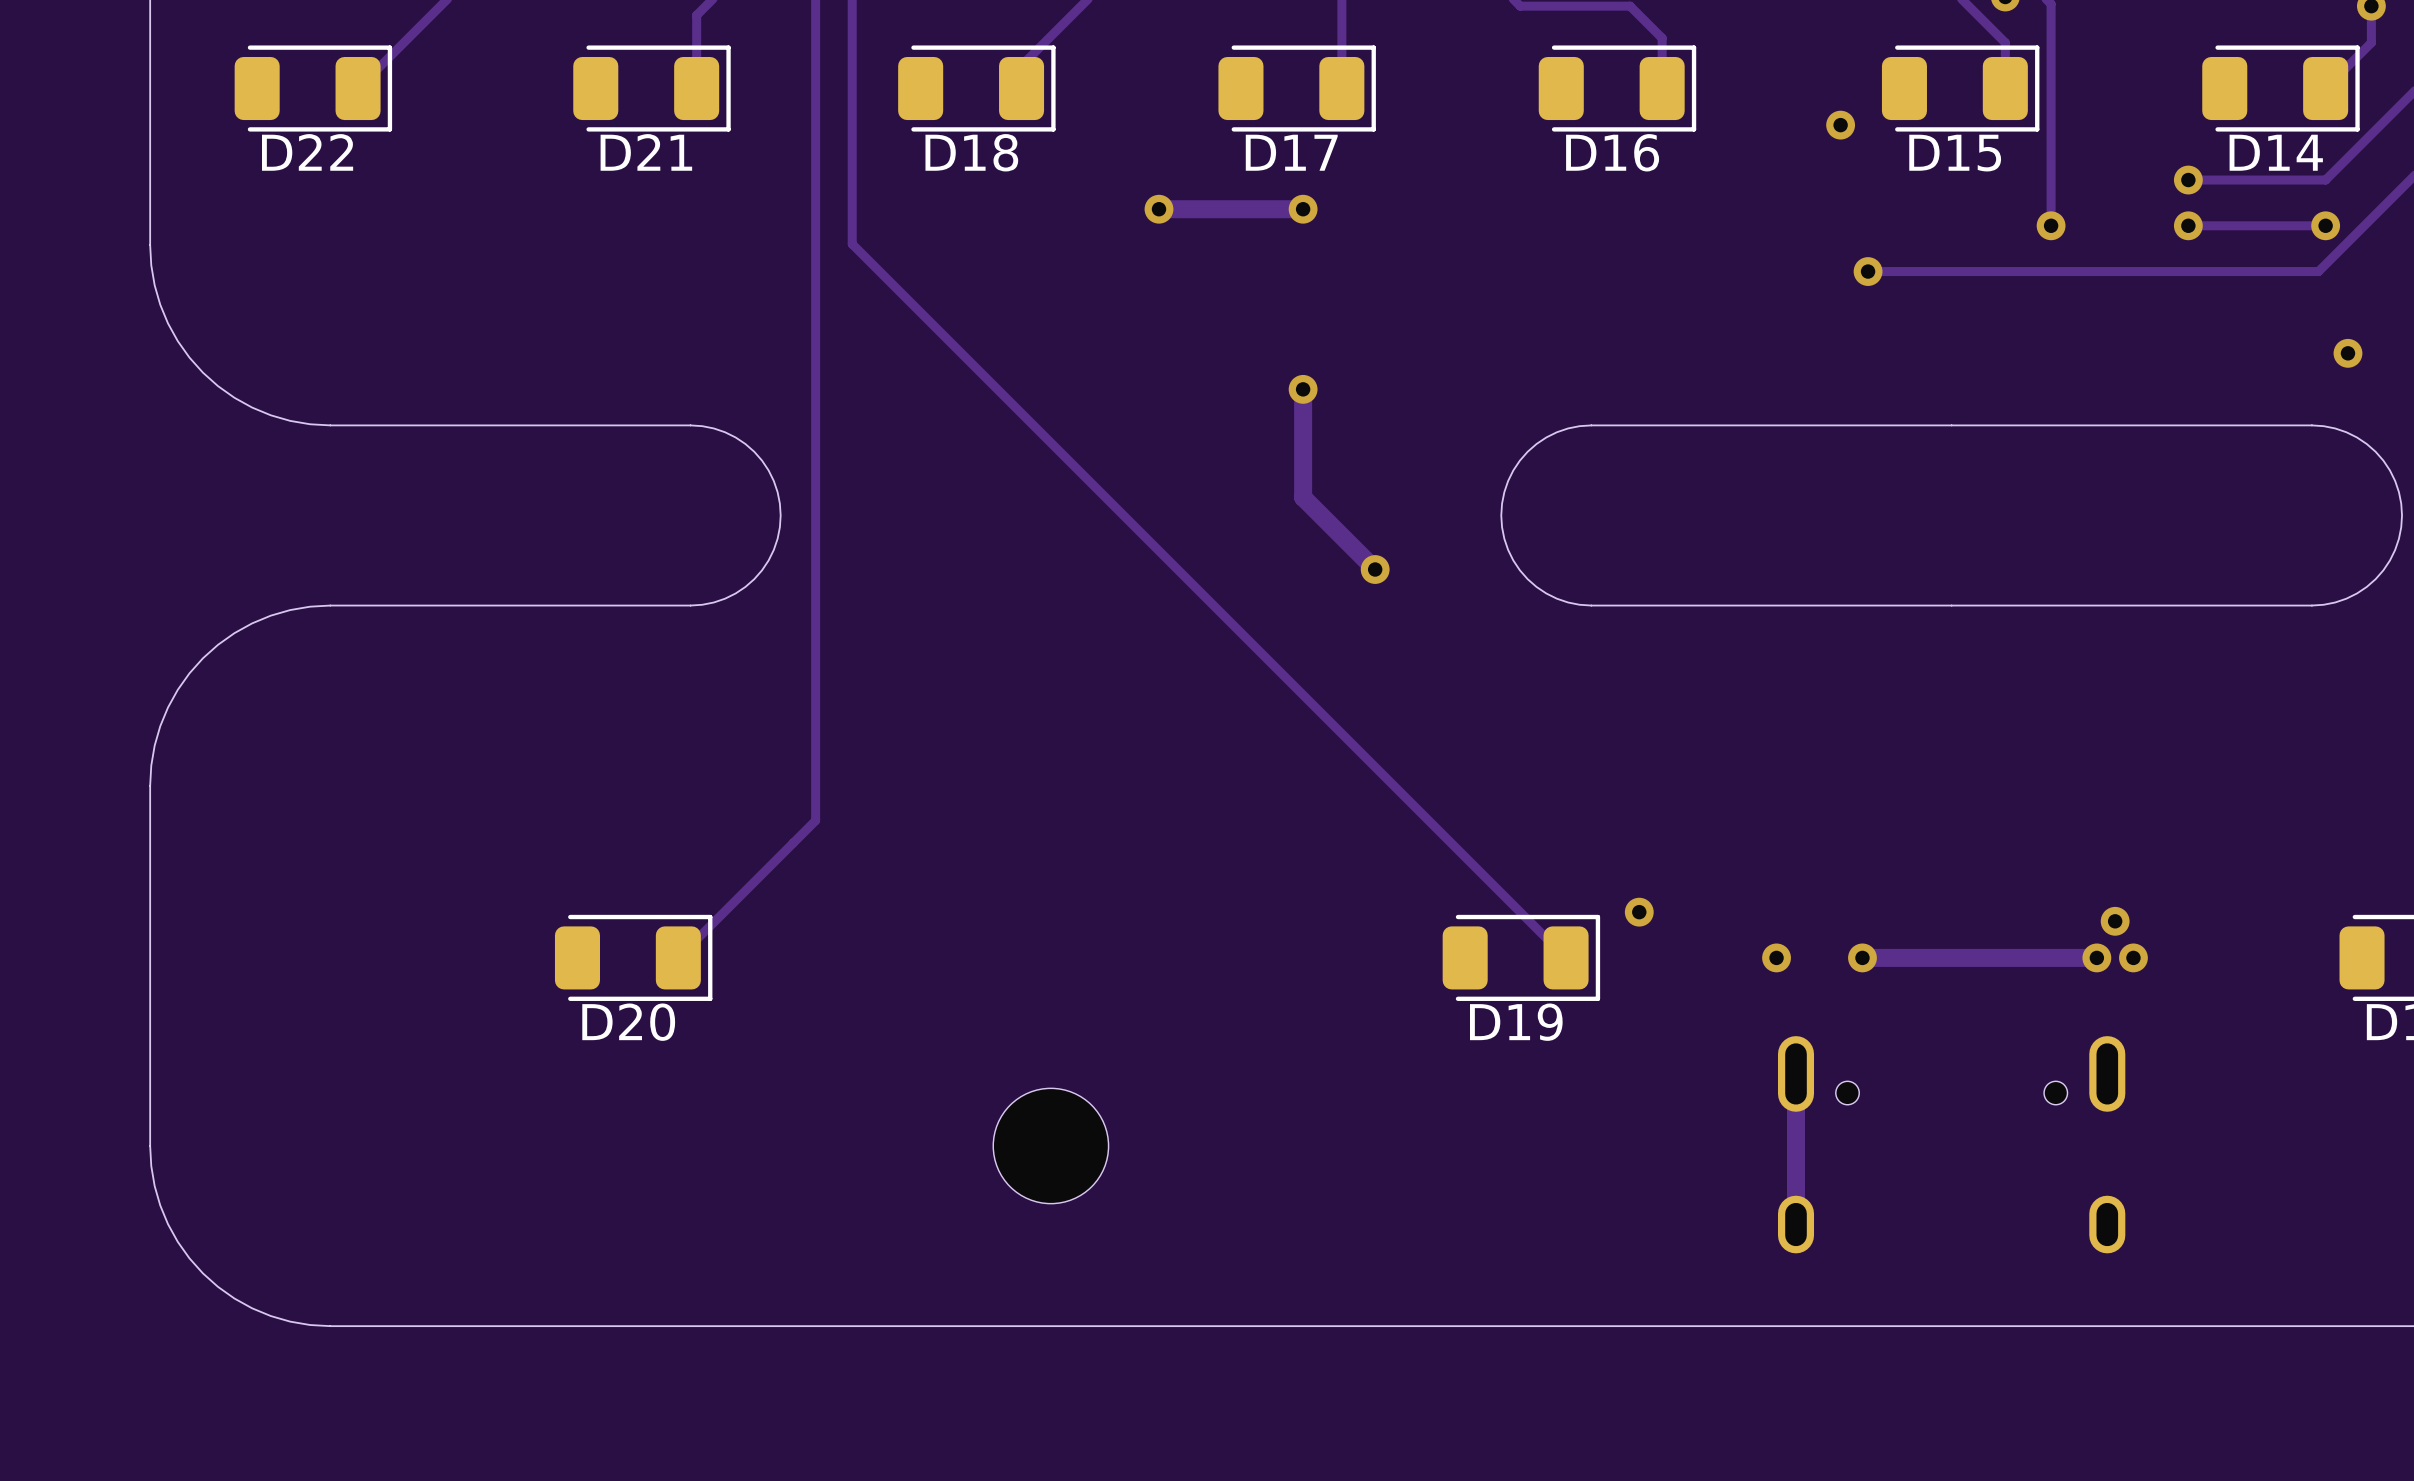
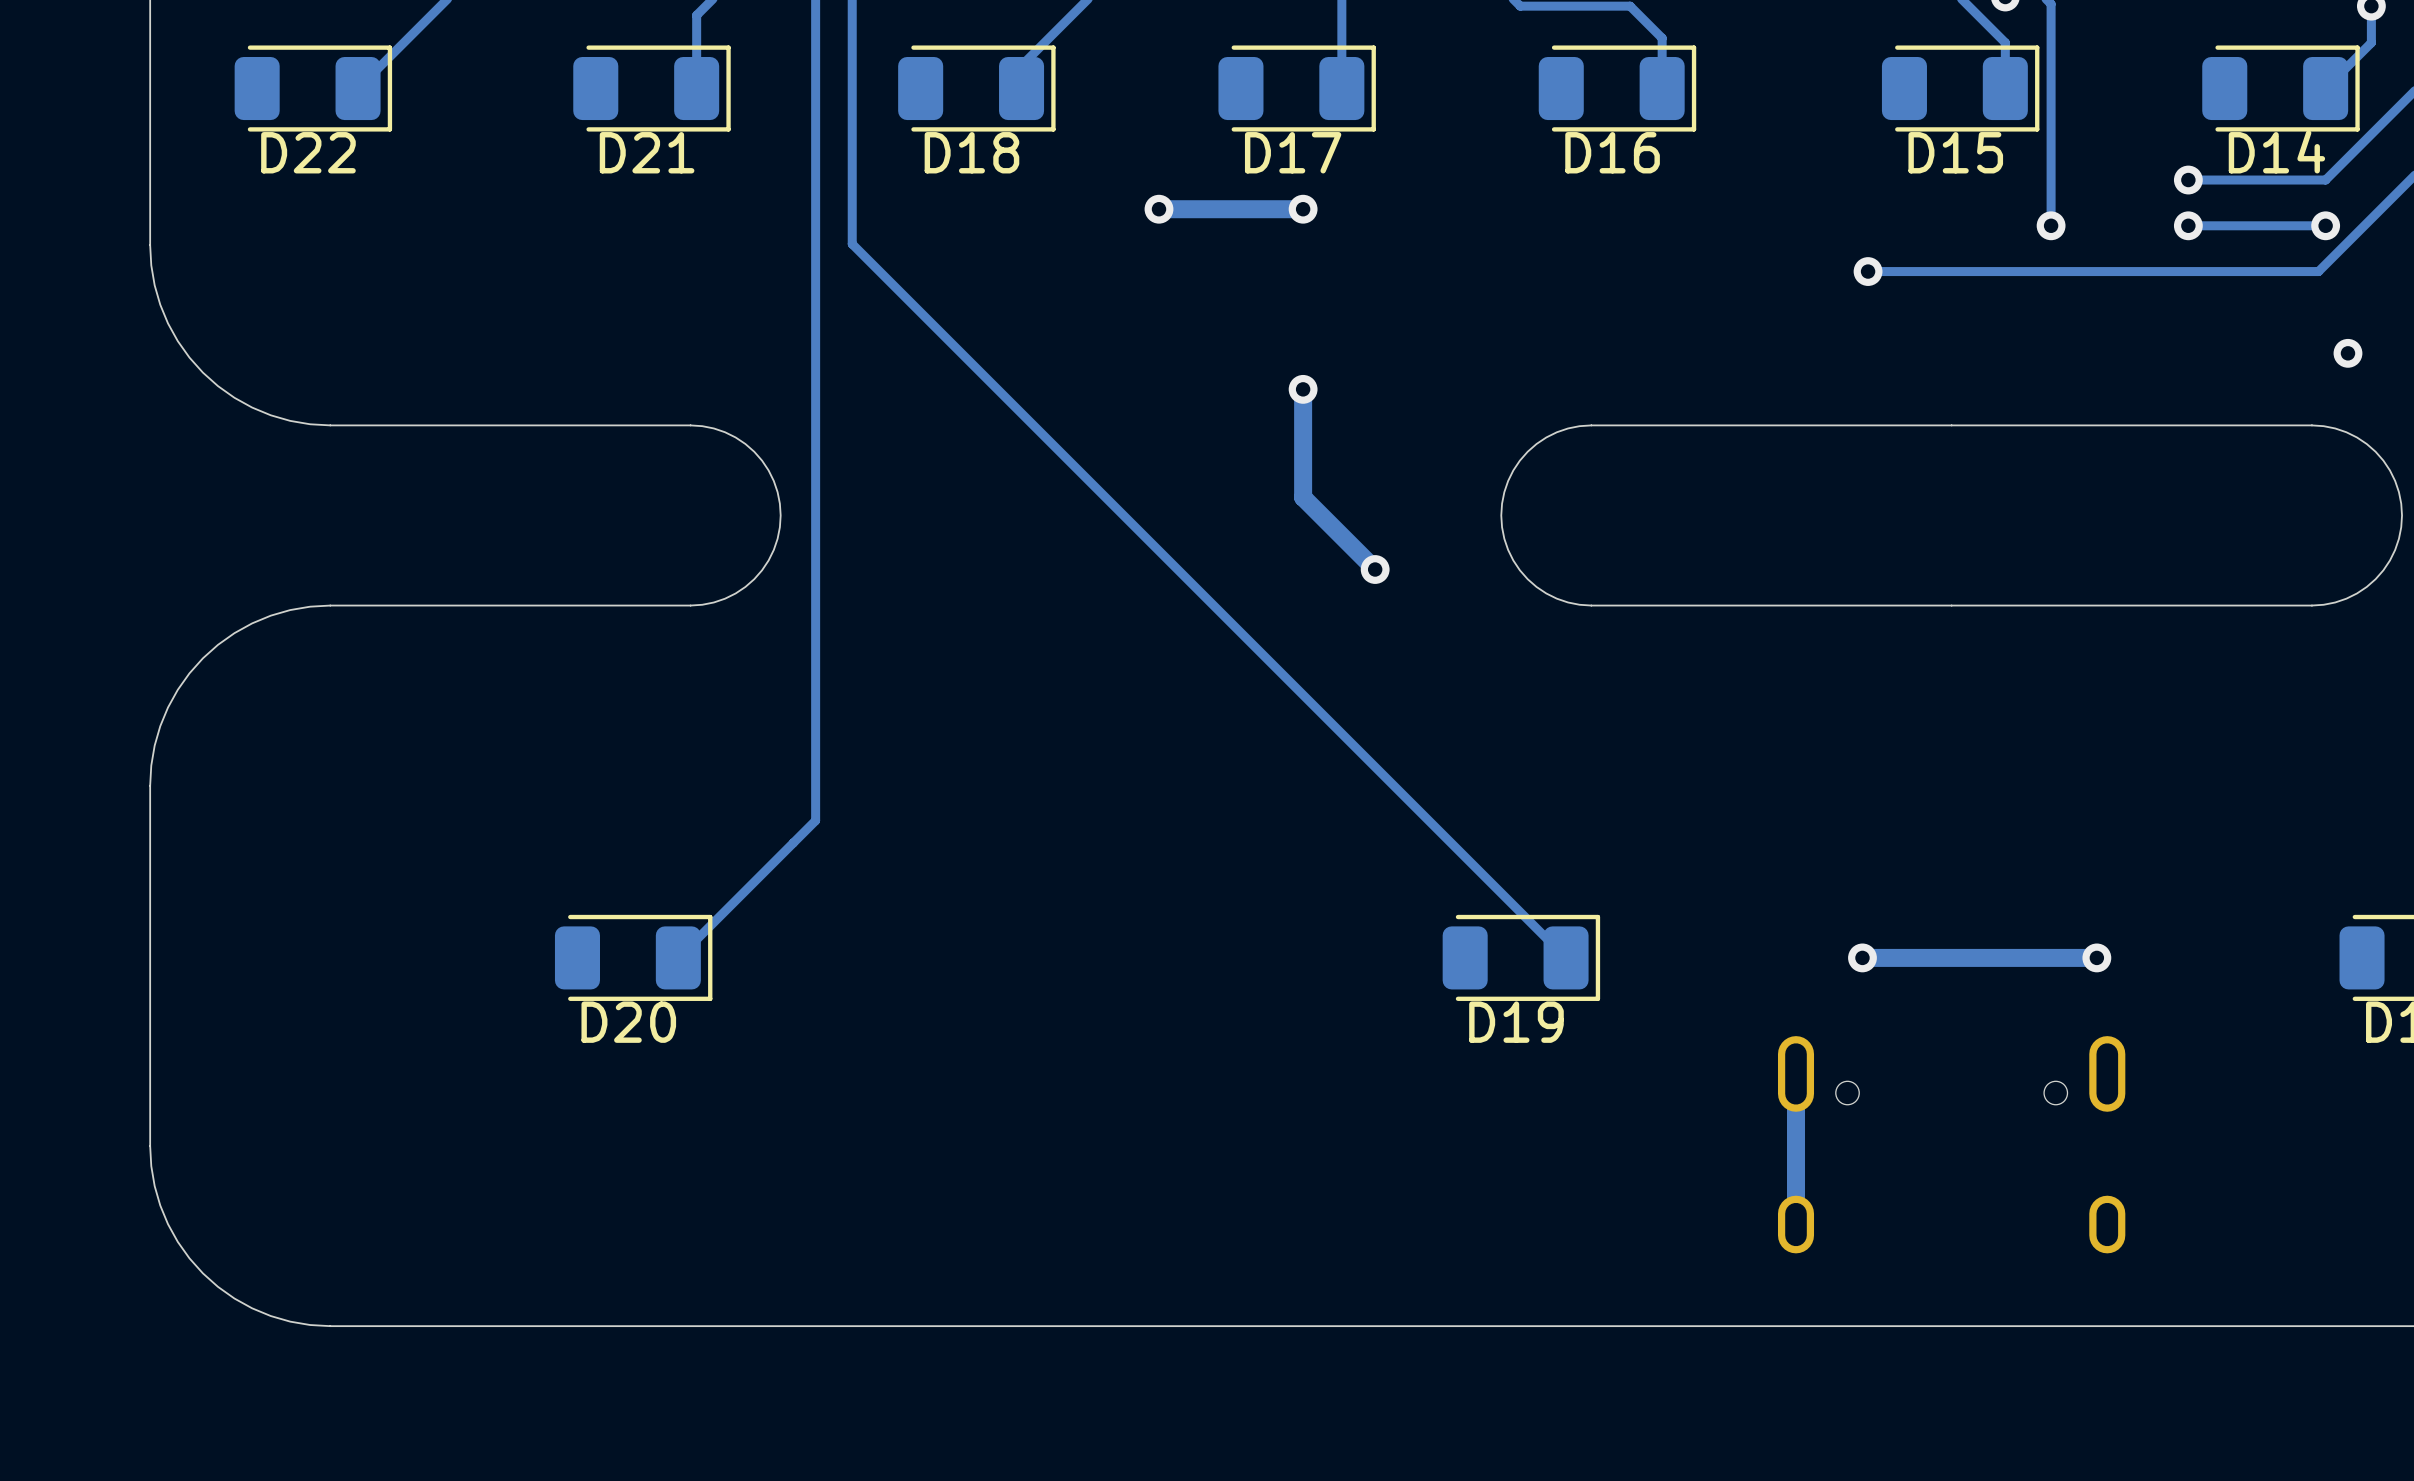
via: (1840, 125) -> none
via: (1639, 912) -> none
via: (2115, 921) -> none
via: (1776, 957) -> none
via: (2133, 957) -> none
part: (1050, 1145) -> none

